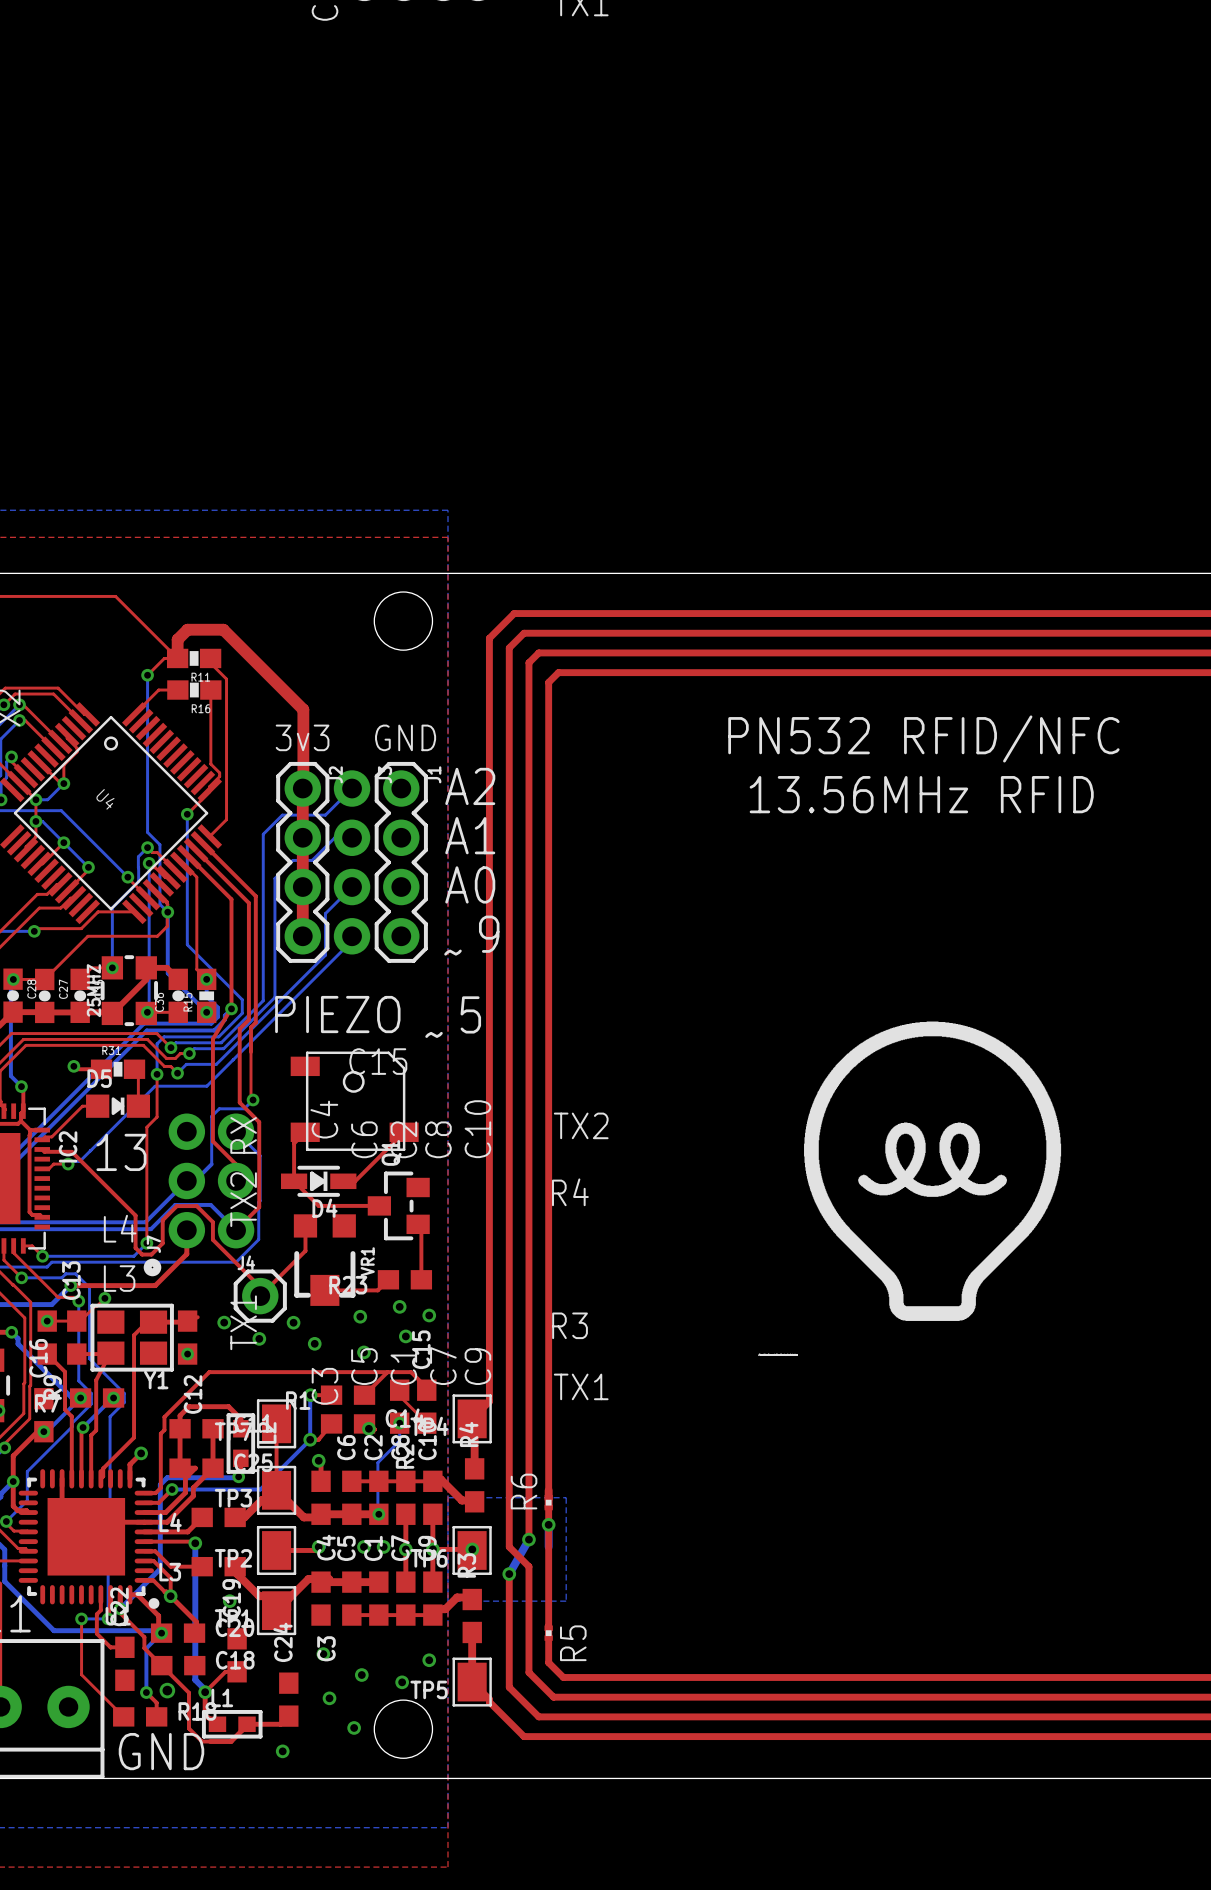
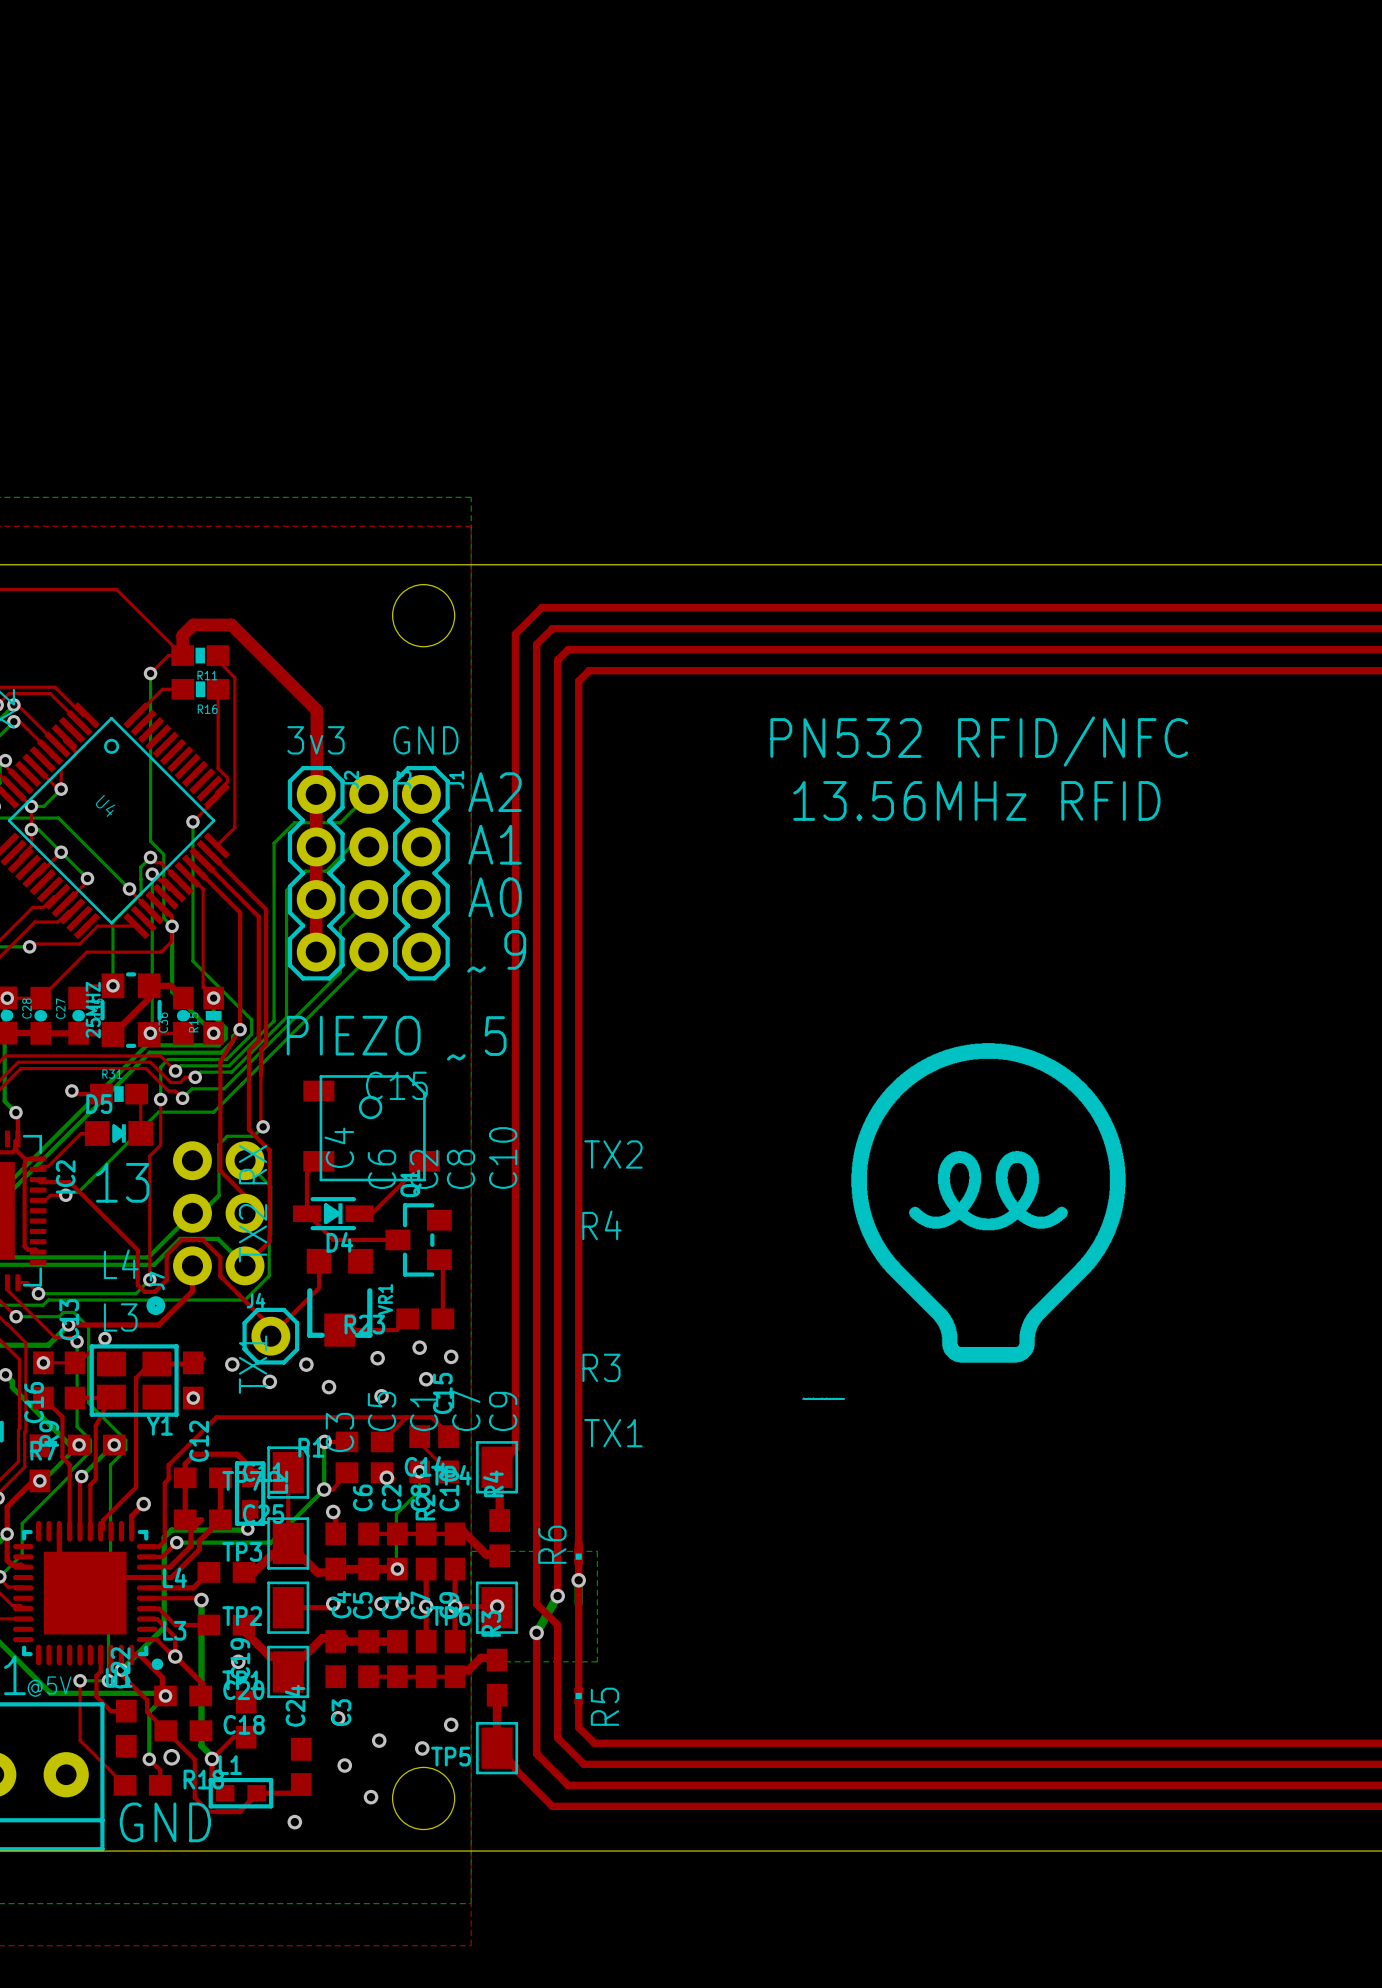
text: none -> @5V (49, 1686)

